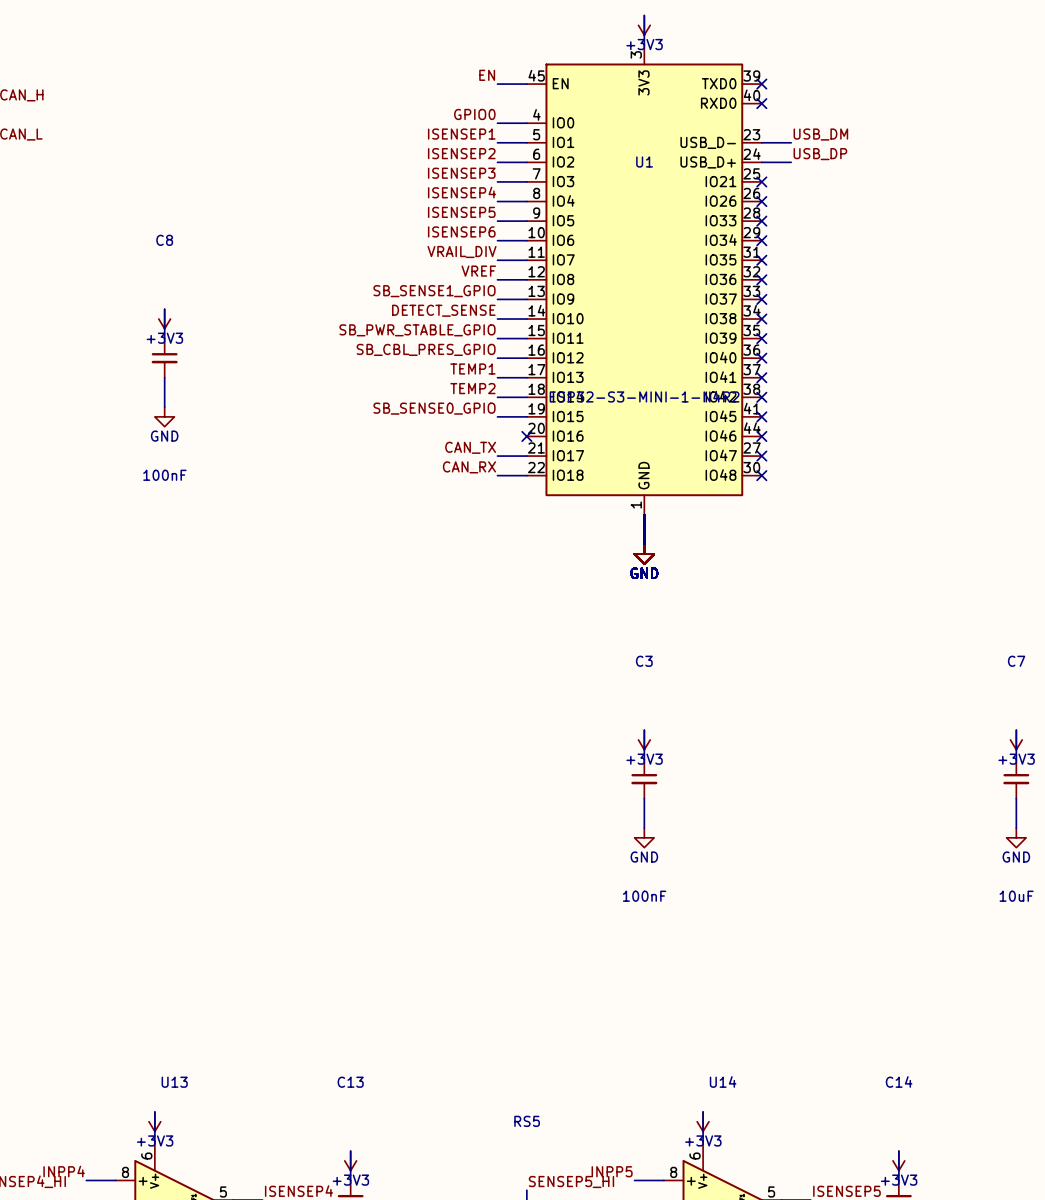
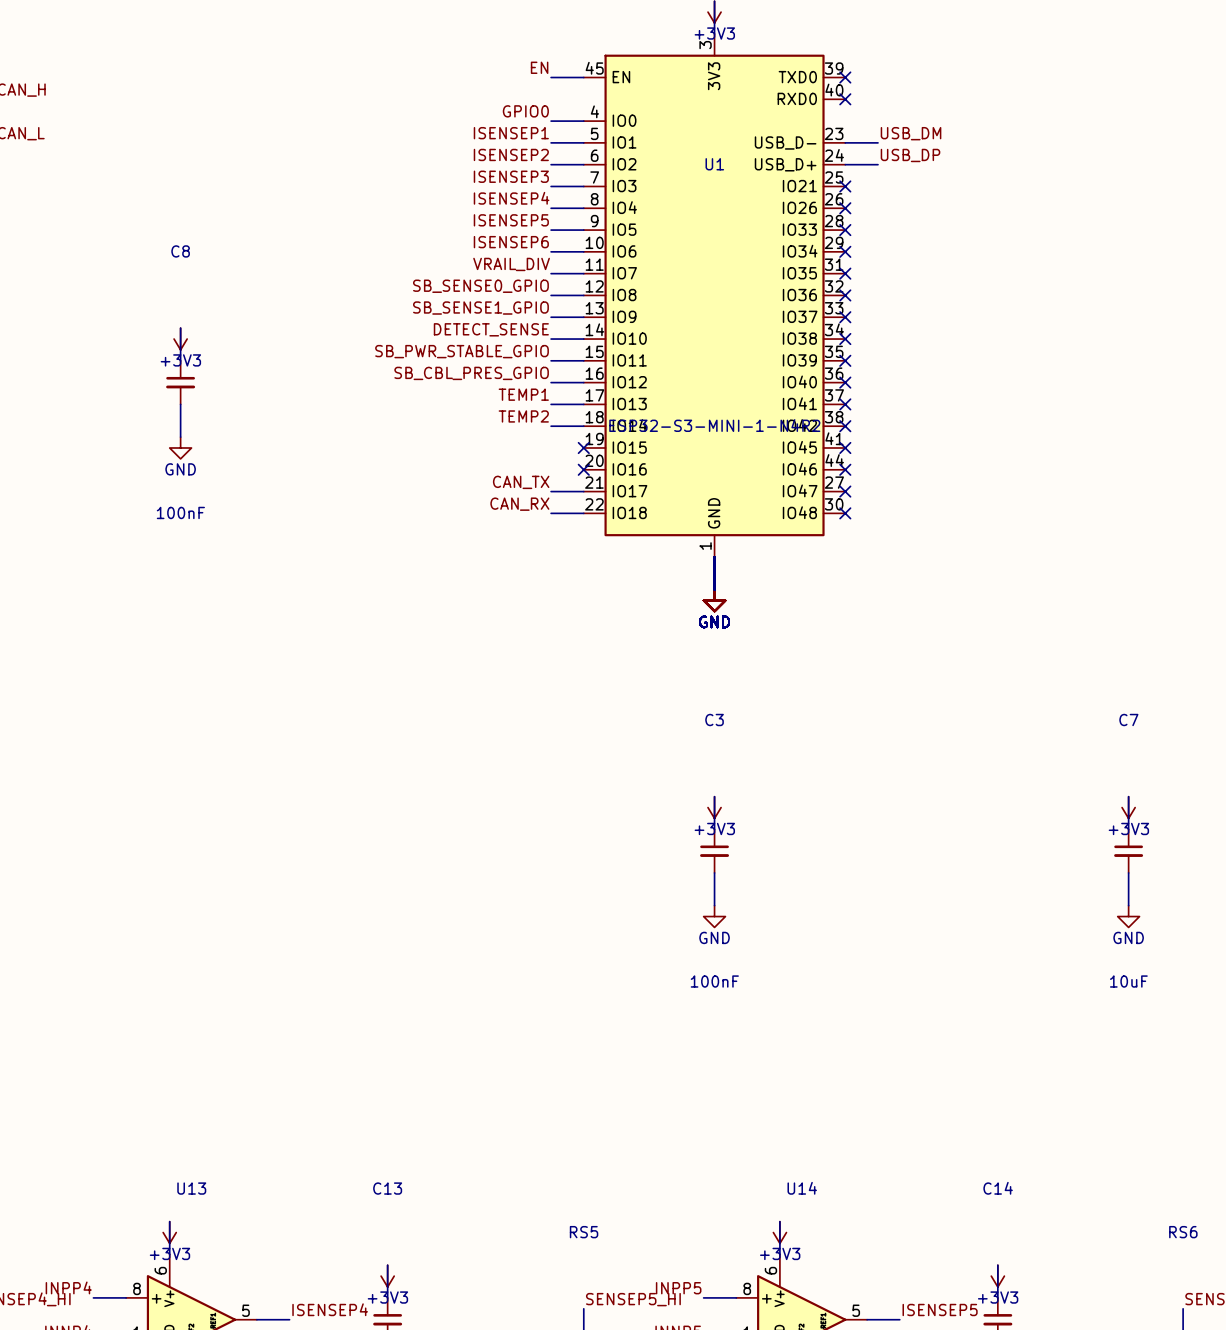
label: VREF (478, 271) -> SB_SENSE0_GPIO (480, 286)
label: SB_SENSE0_GPIO (434, 408) -> none
wire: (497, 416) (526, 416) -> none
no-connect mark: none -> (583, 447)

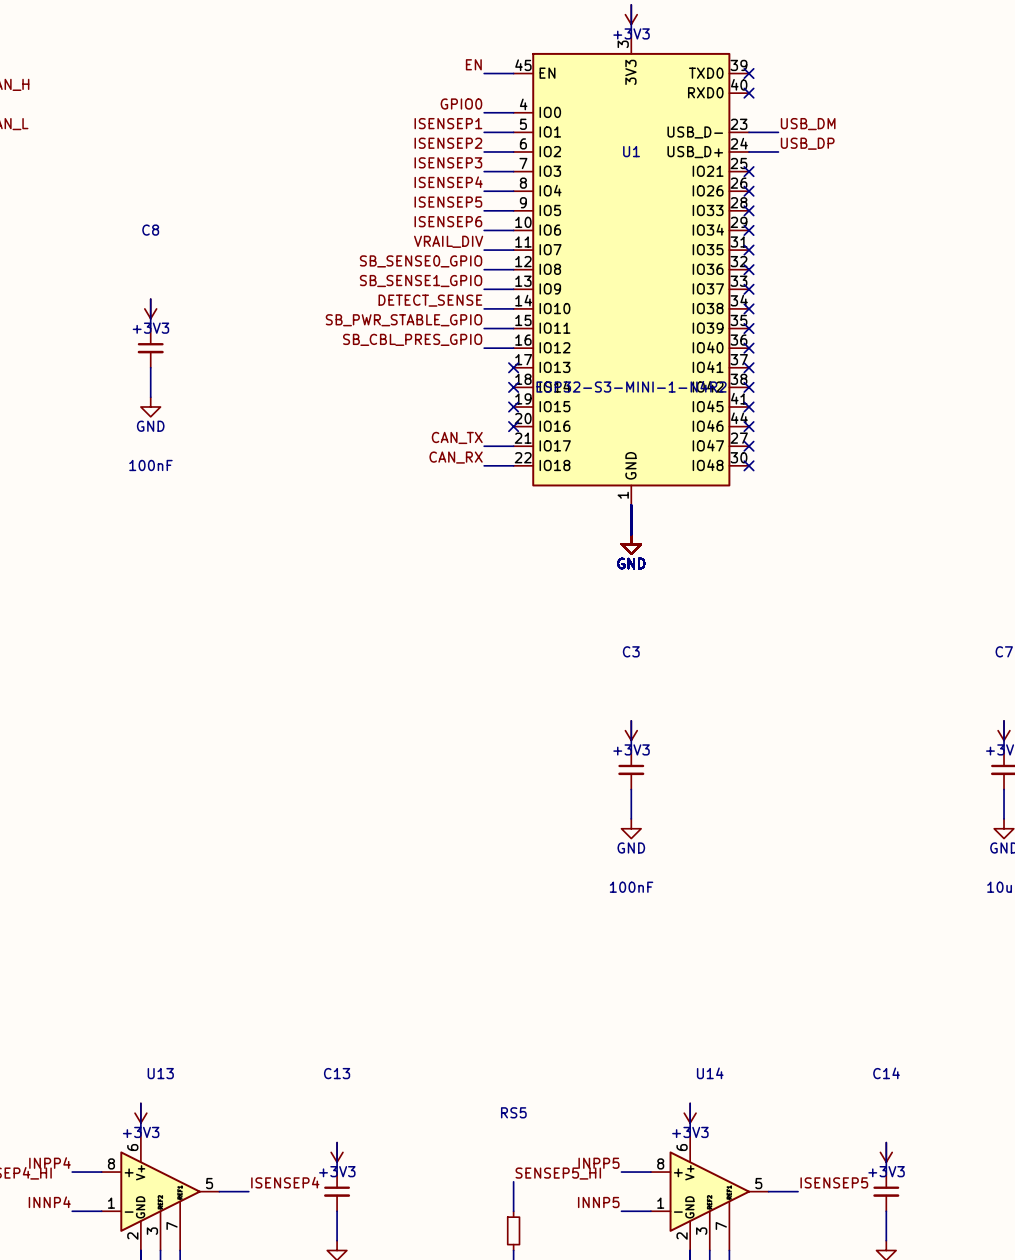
label: TEMP1 (523, 394) -> none
wire: (551, 404) (583, 404) -> none
no-connect mark: none -> (513, 367)
label: TEMP2 (523, 416) -> none
wire: (551, 426) (583, 426) -> none
no-connect mark: none -> (513, 387)

